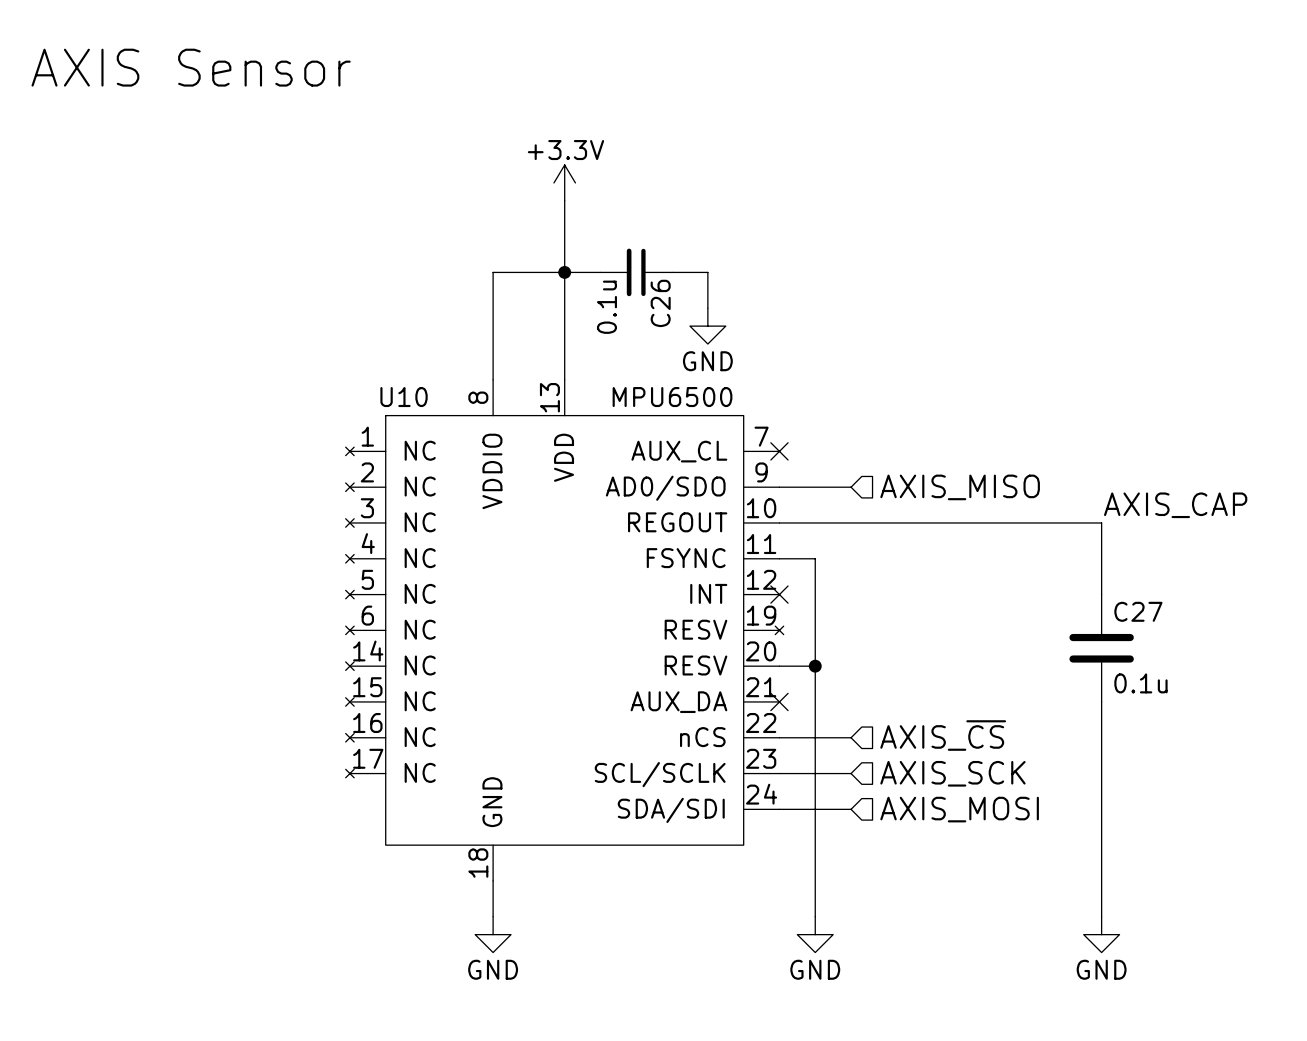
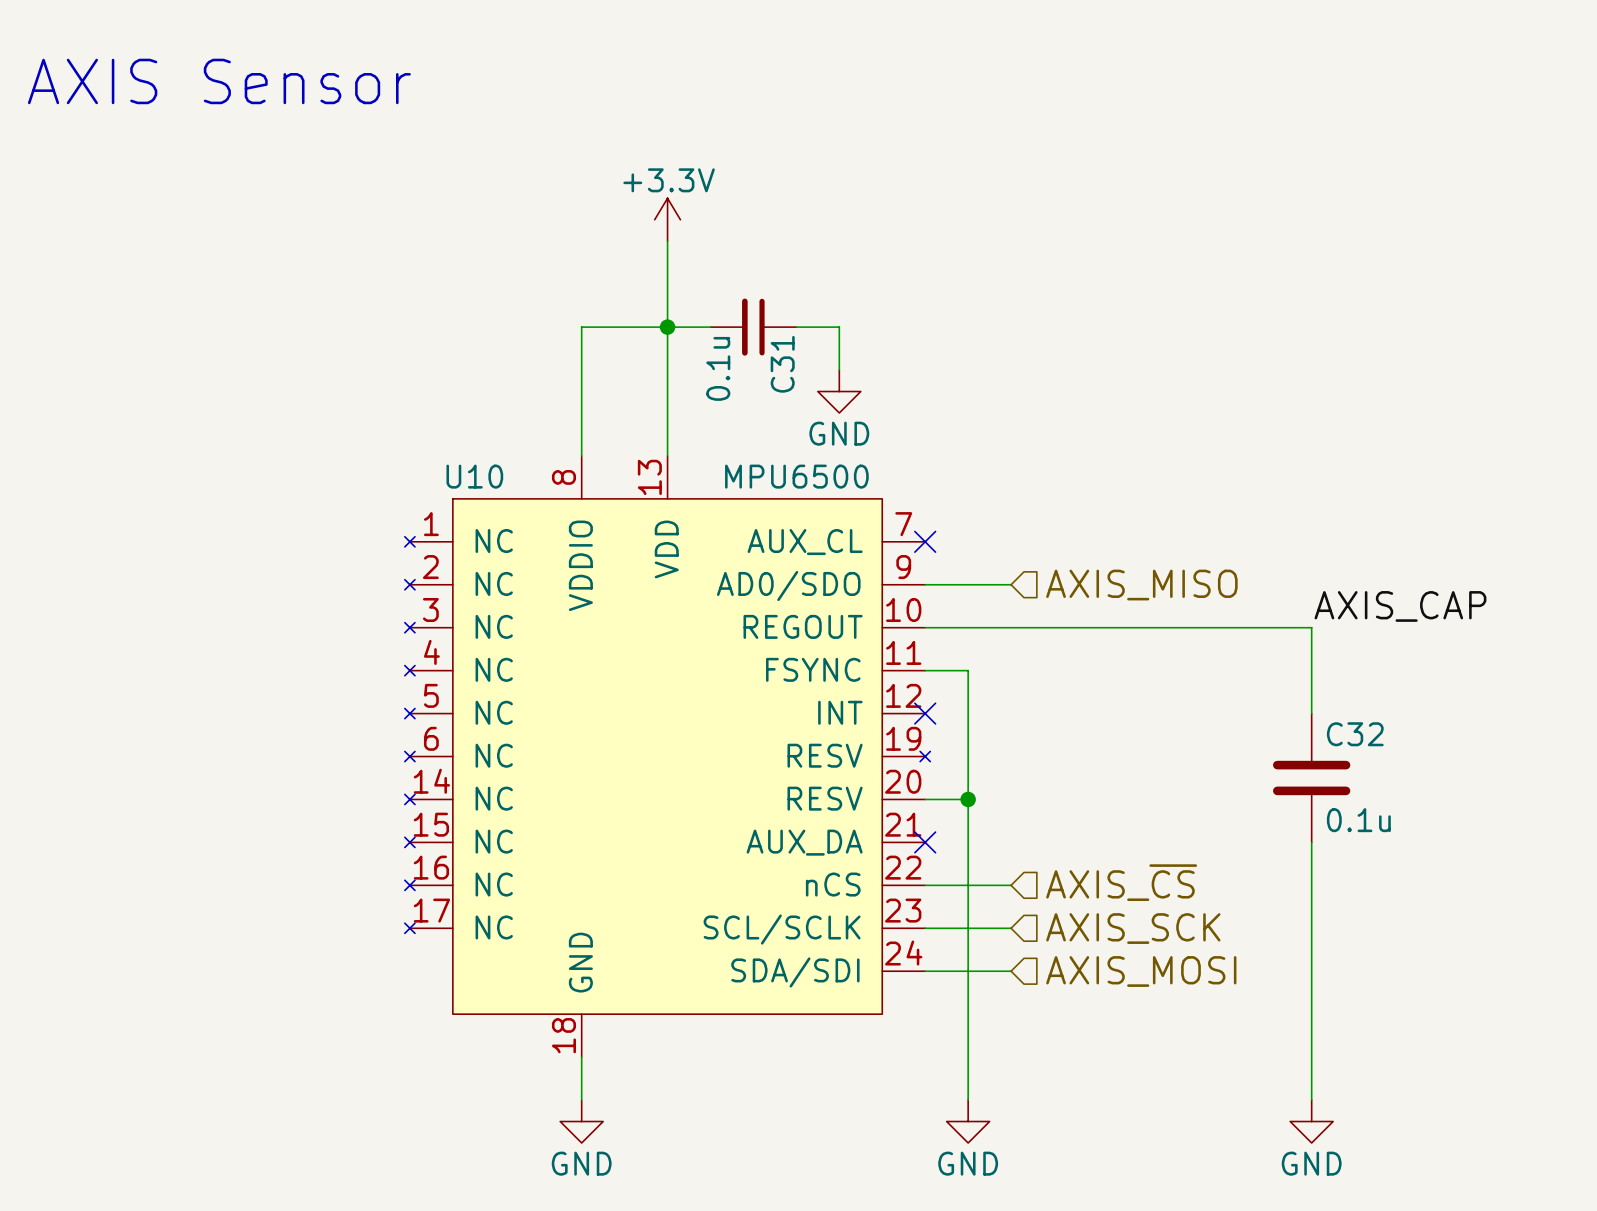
C26 name: C26 (660, 303) -> C31 (782, 364)
C27 name: C27 (1138, 611) -> C32 (1355, 734)

